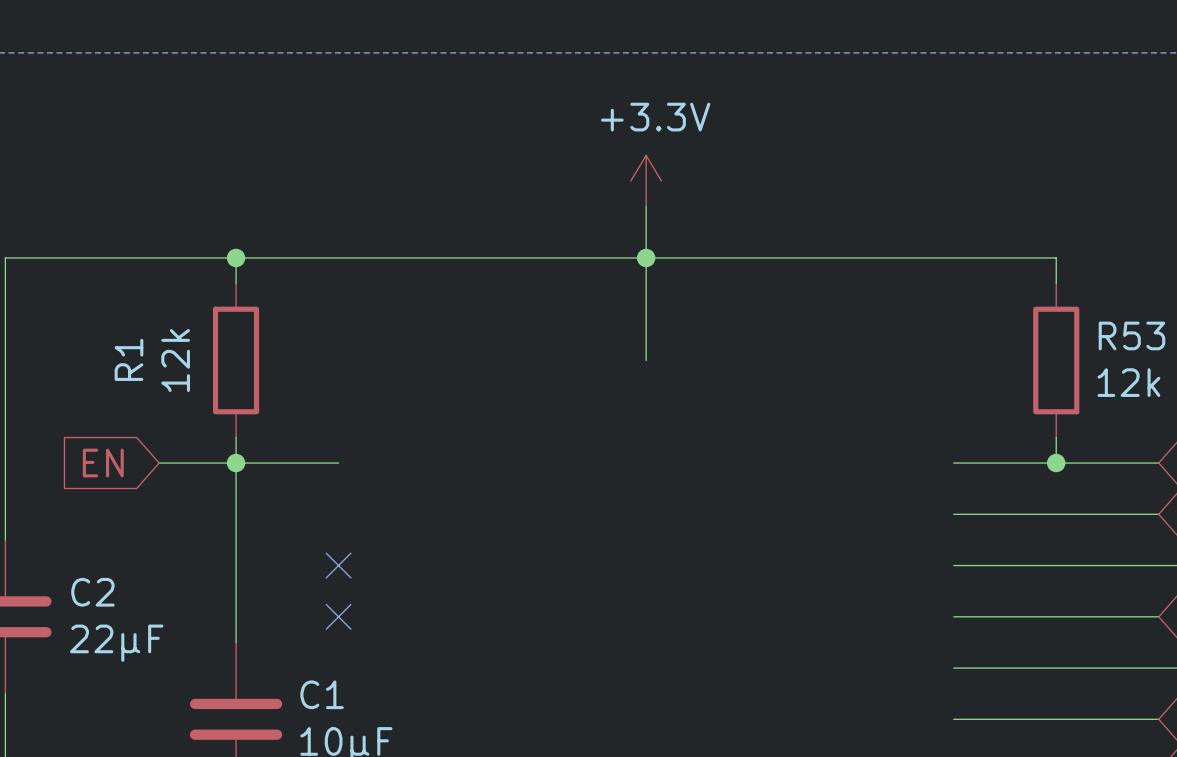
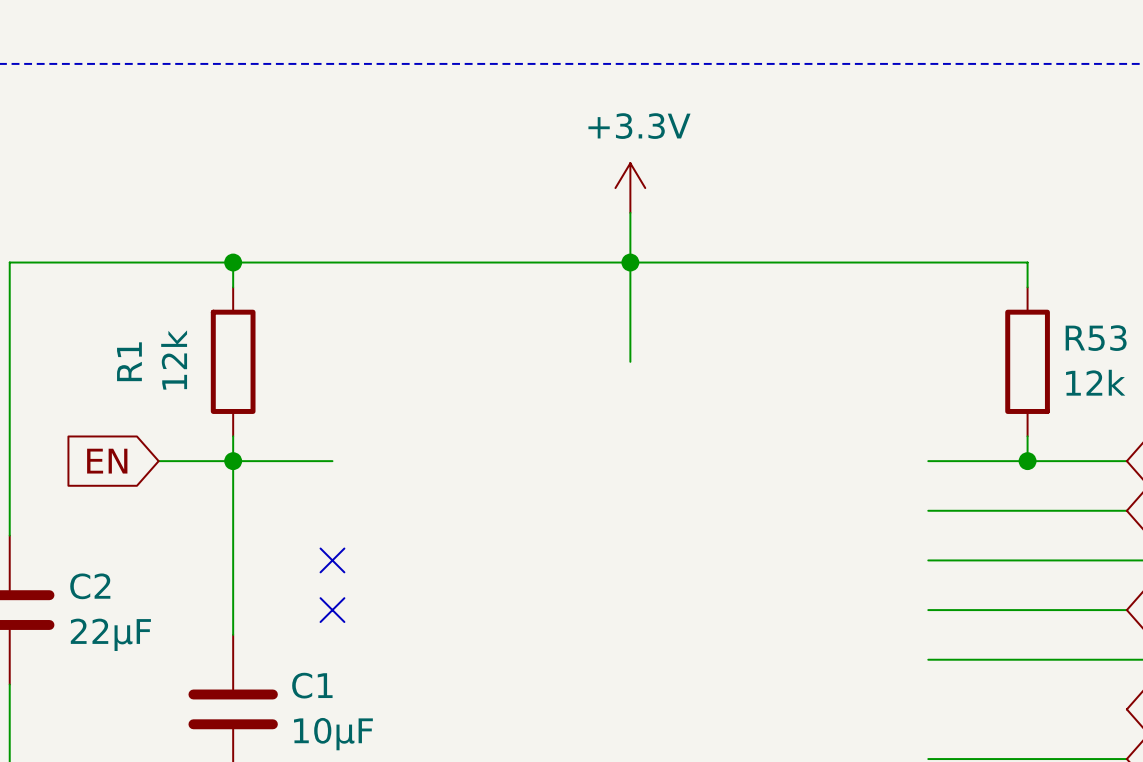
wire: (953, 719) (1158, 719) -> none

